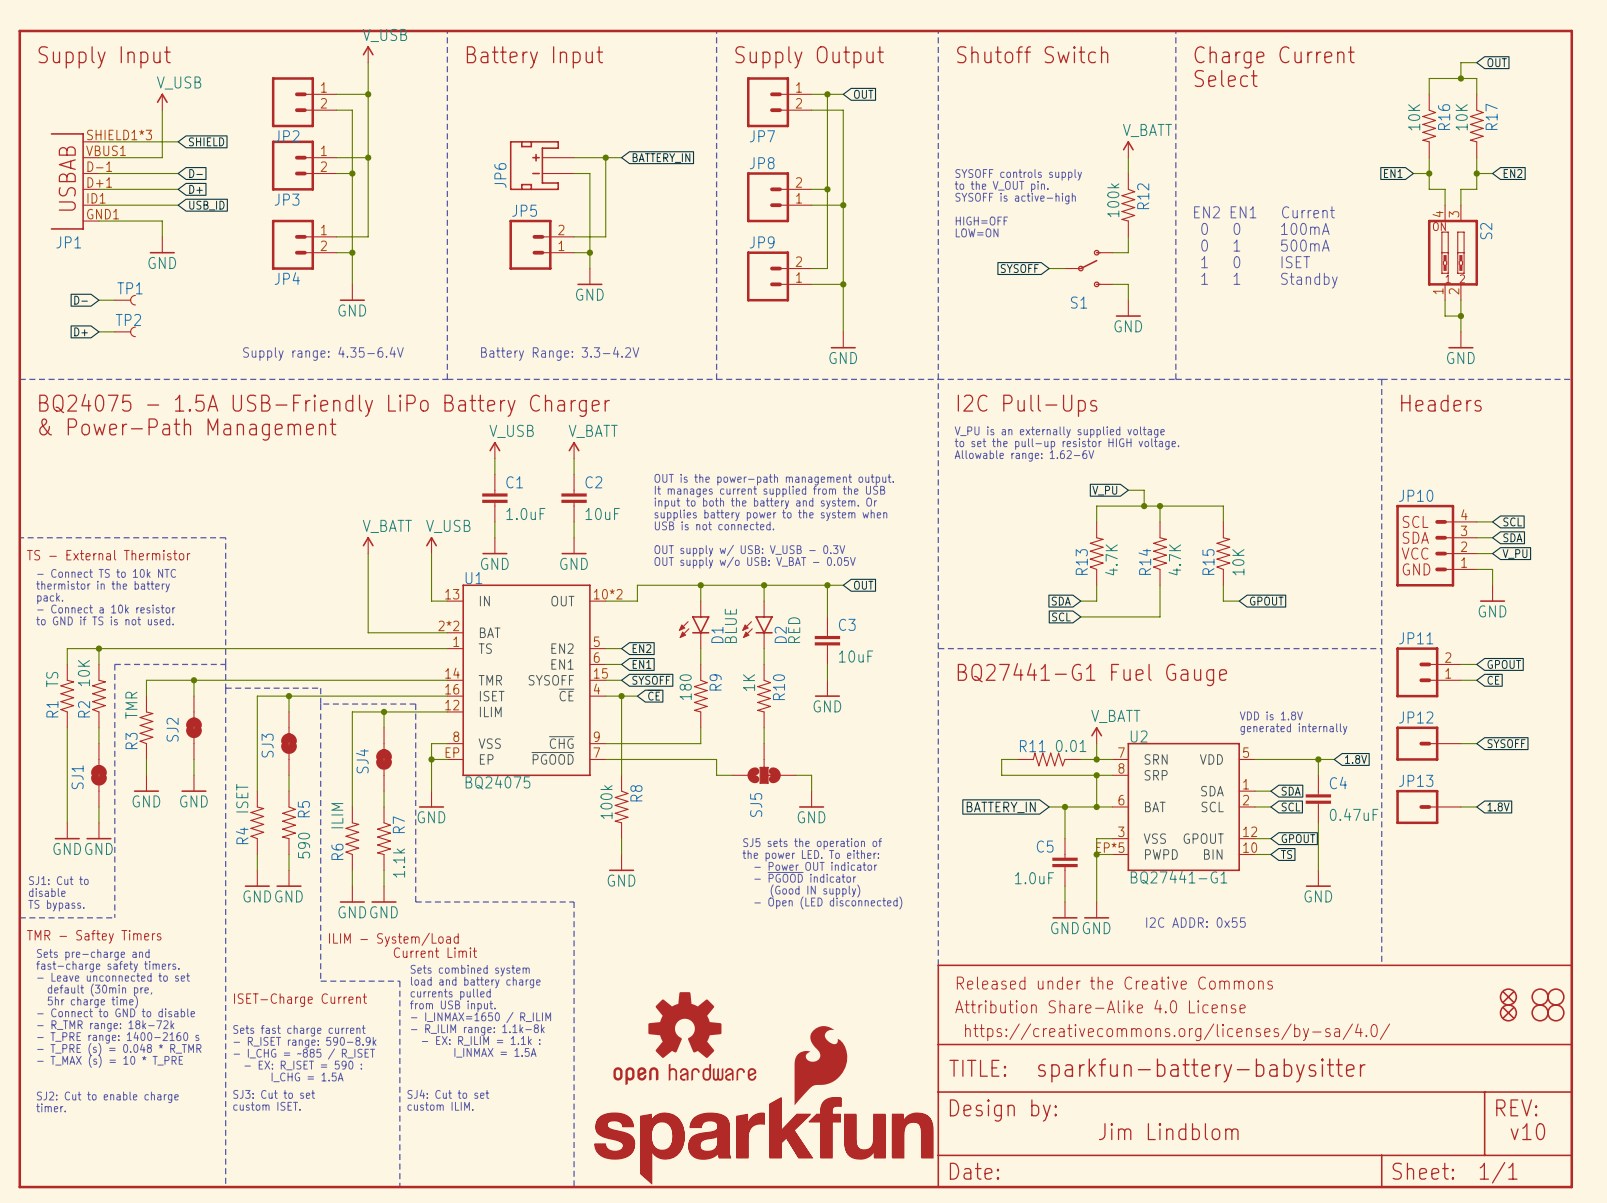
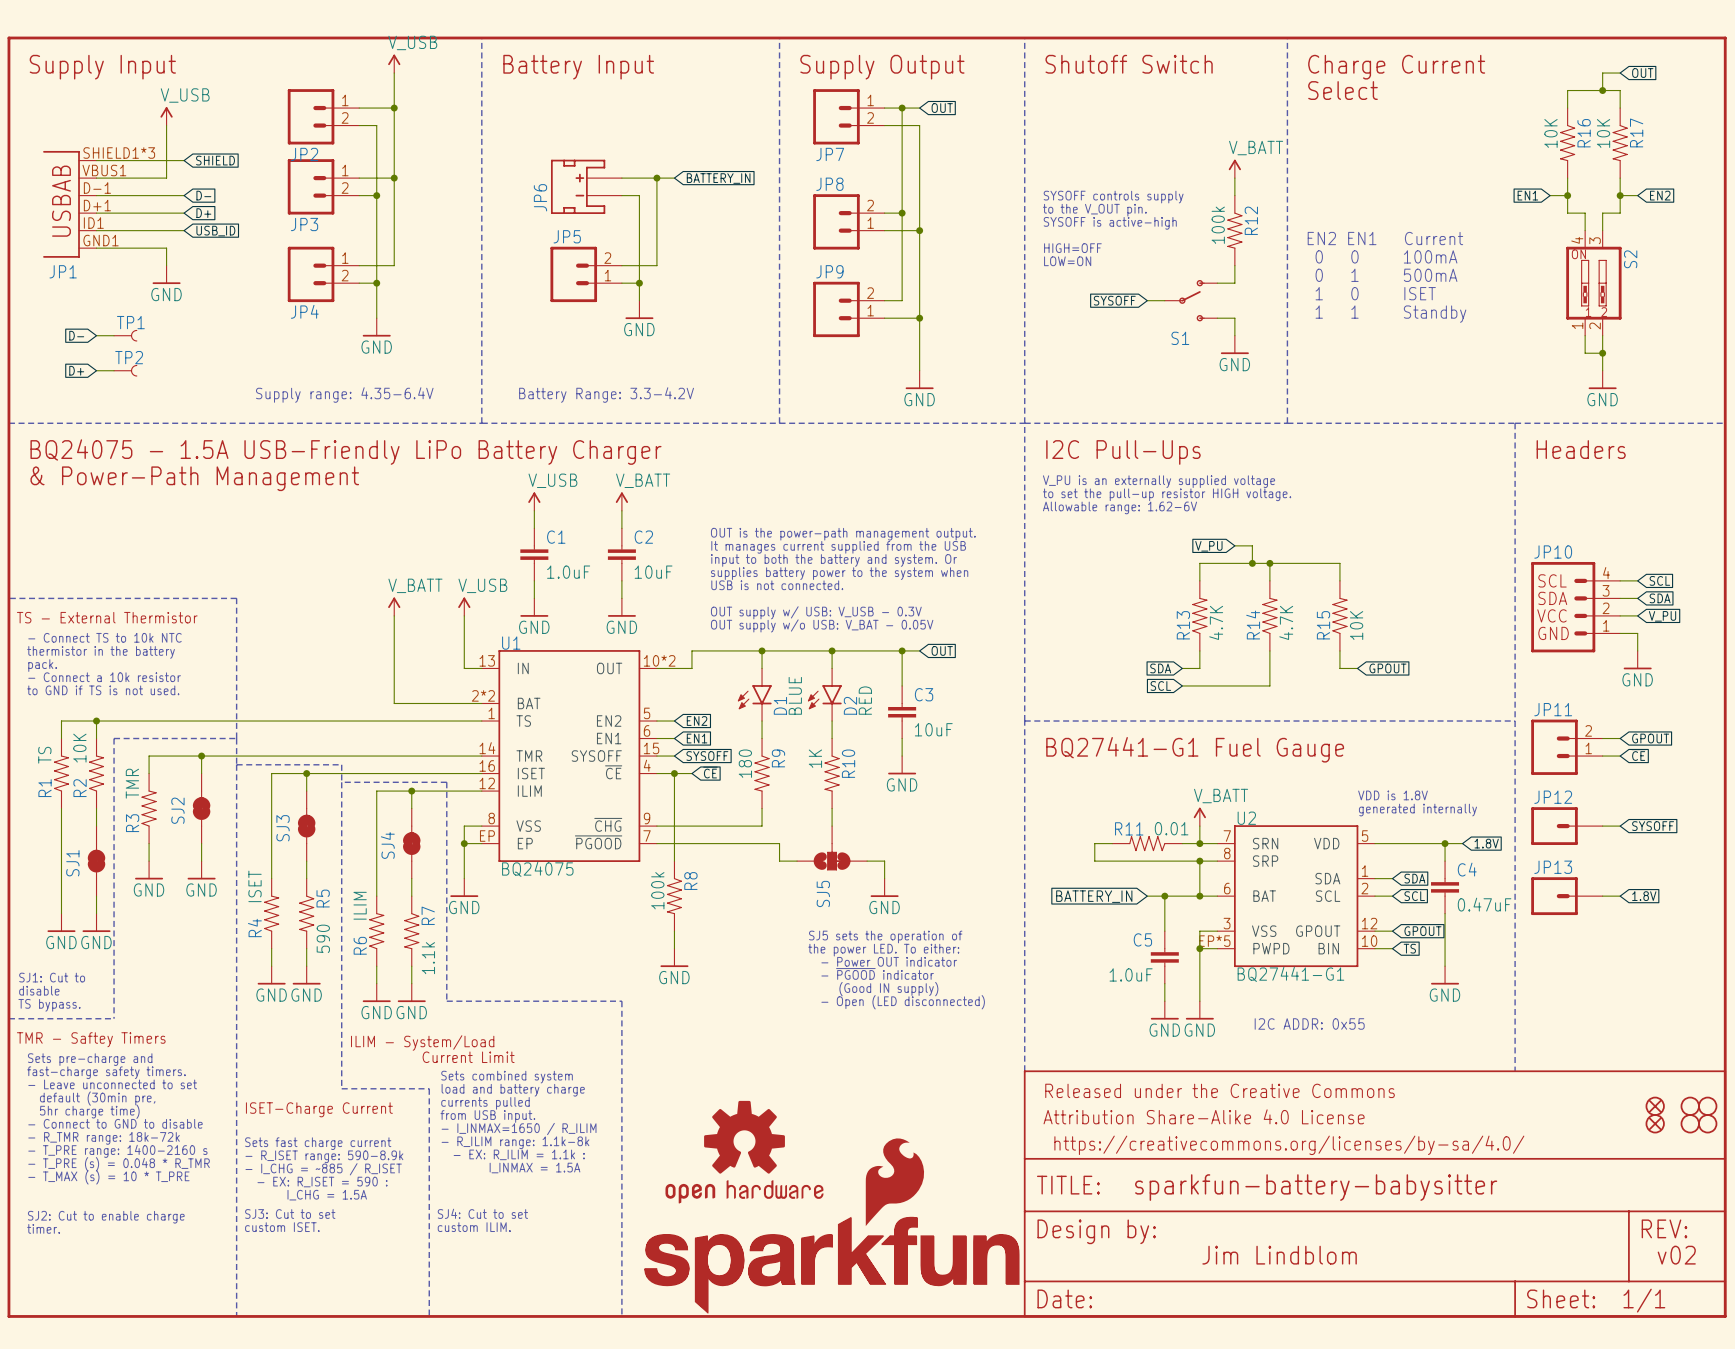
text: v10 (1527, 1131) -> v02 (1676, 1255)

